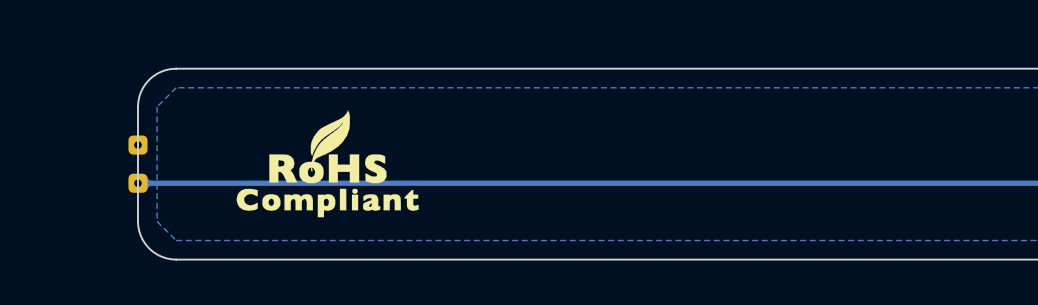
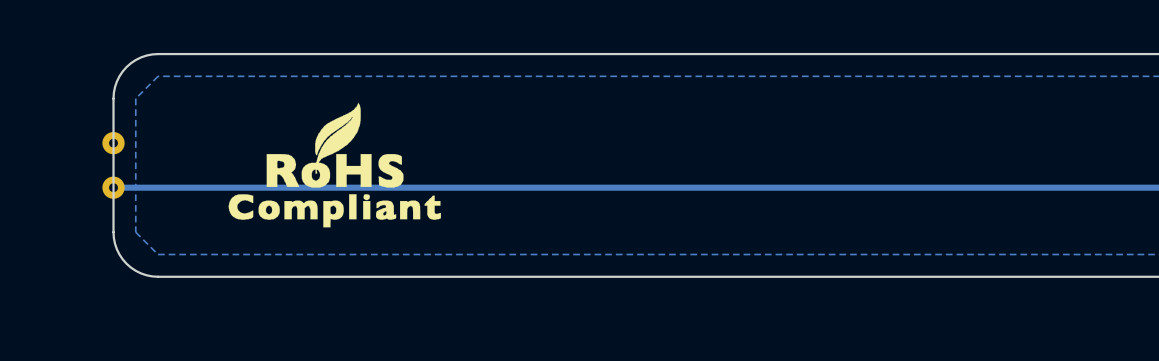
part footprint: [128, 135, 148, 155] -> [102, 132, 125, 155]
part footprint: [128, 173, 148, 193] -> [102, 176, 125, 199]
drawing: [146, 176, 152, 190] -> none

